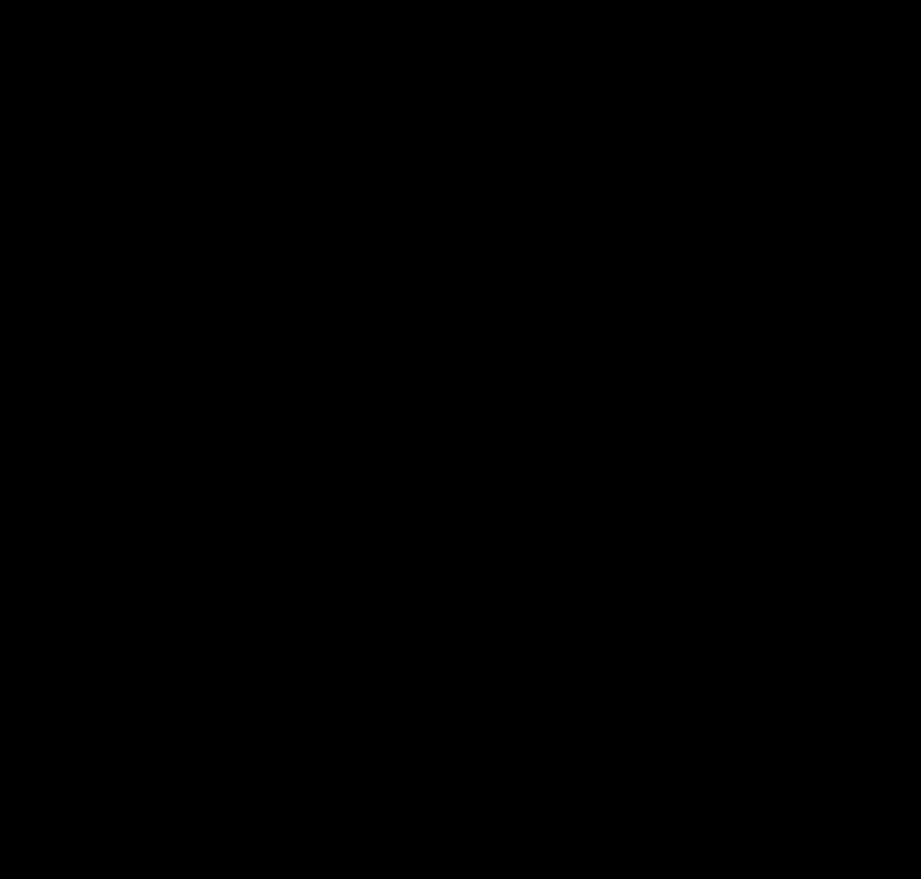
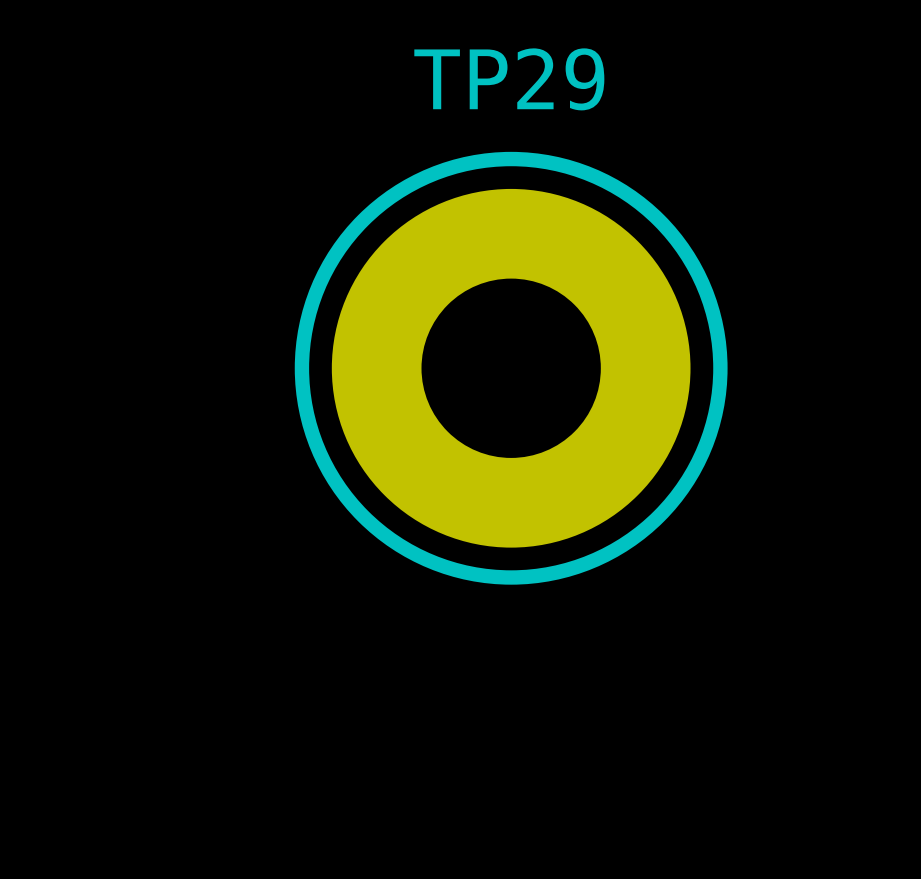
TP29: none -> (511, 368)

